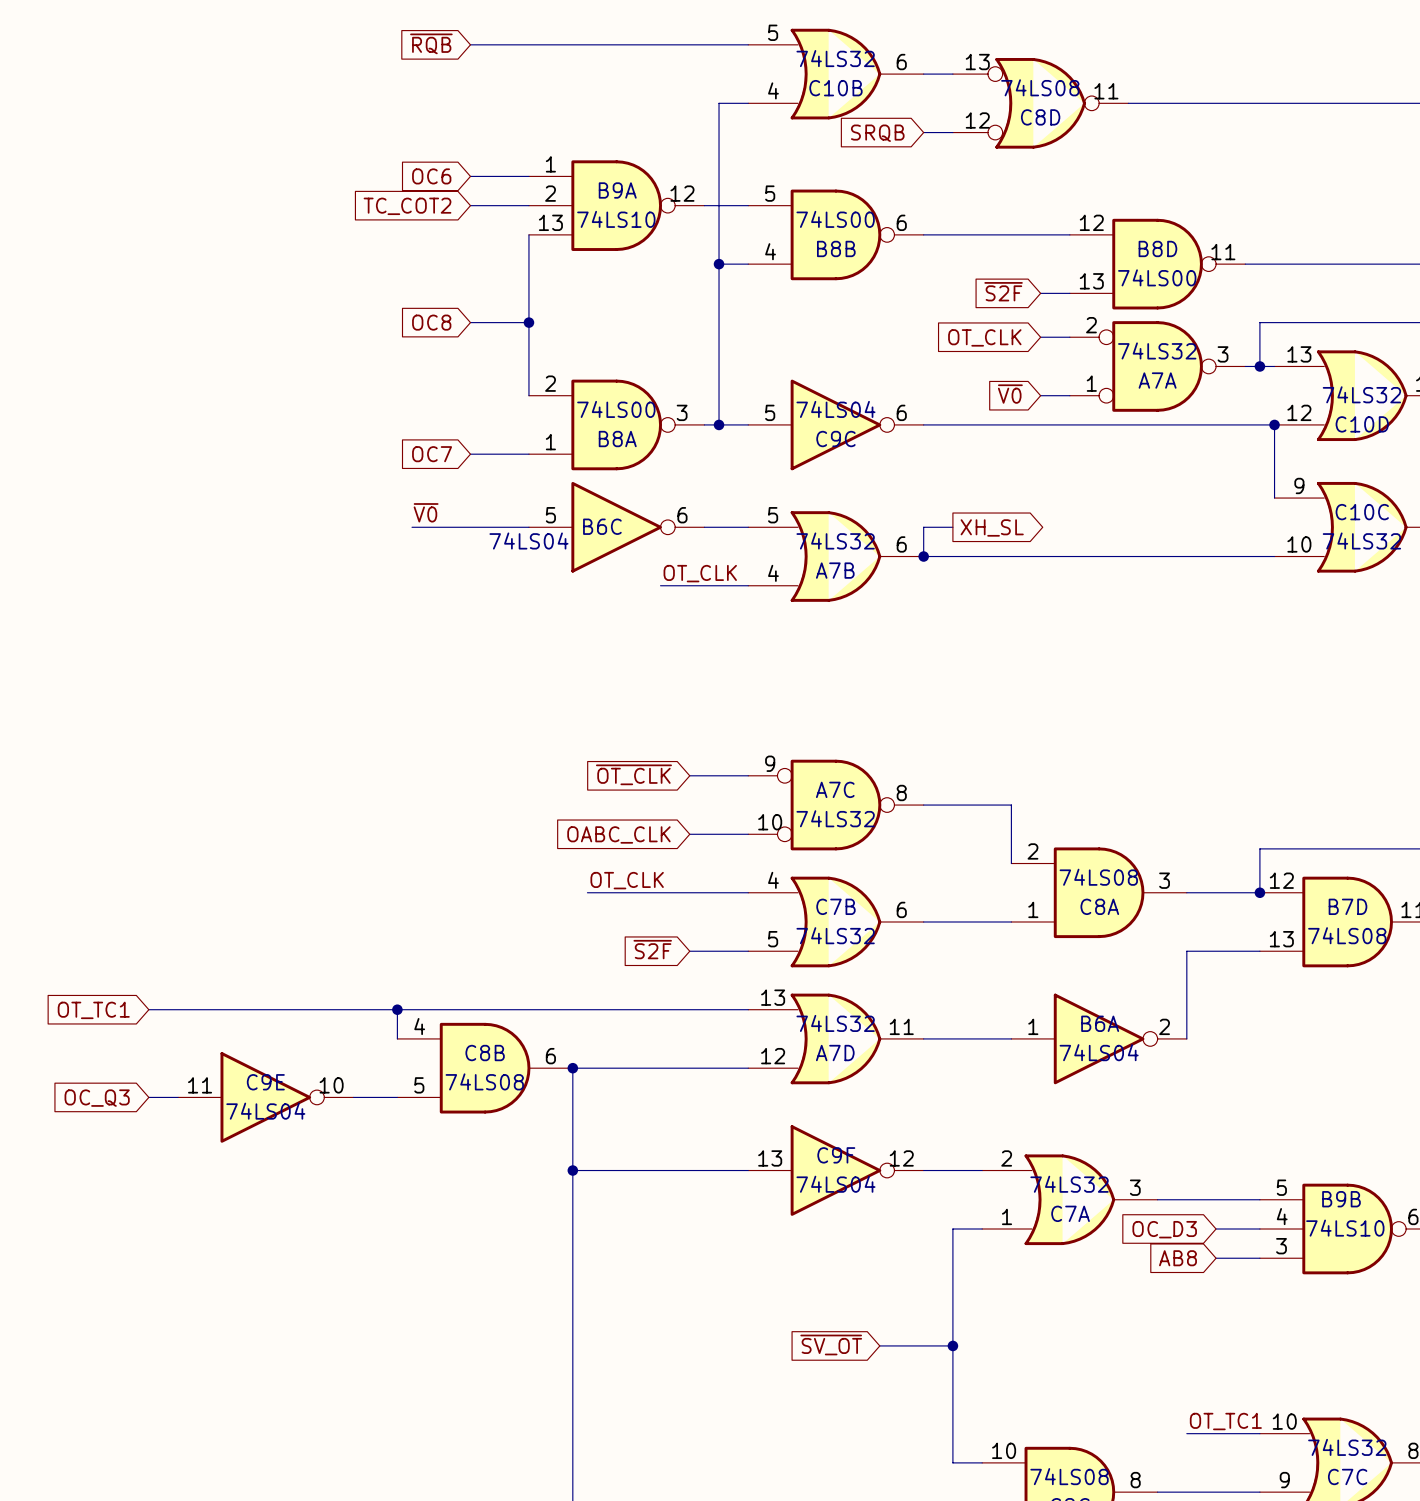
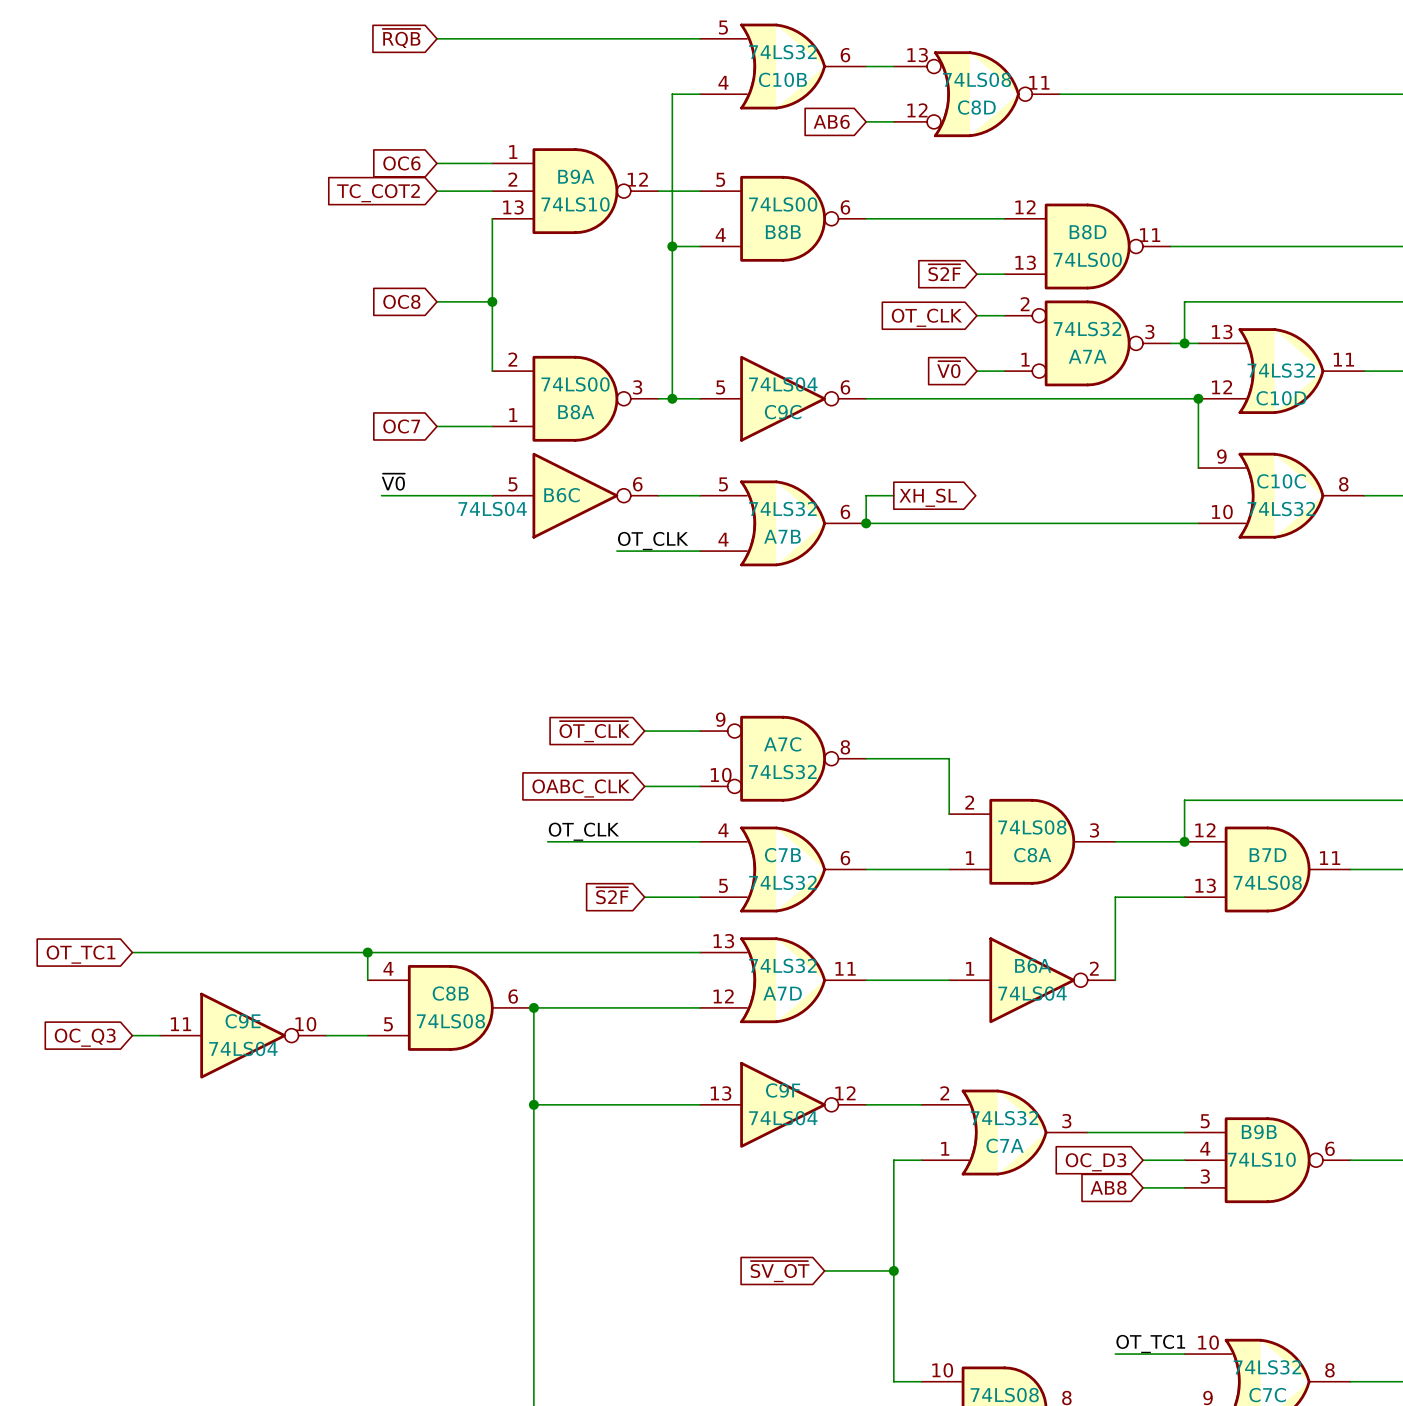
global label: SRQB (877, 133) -> AB6 (831, 121)

